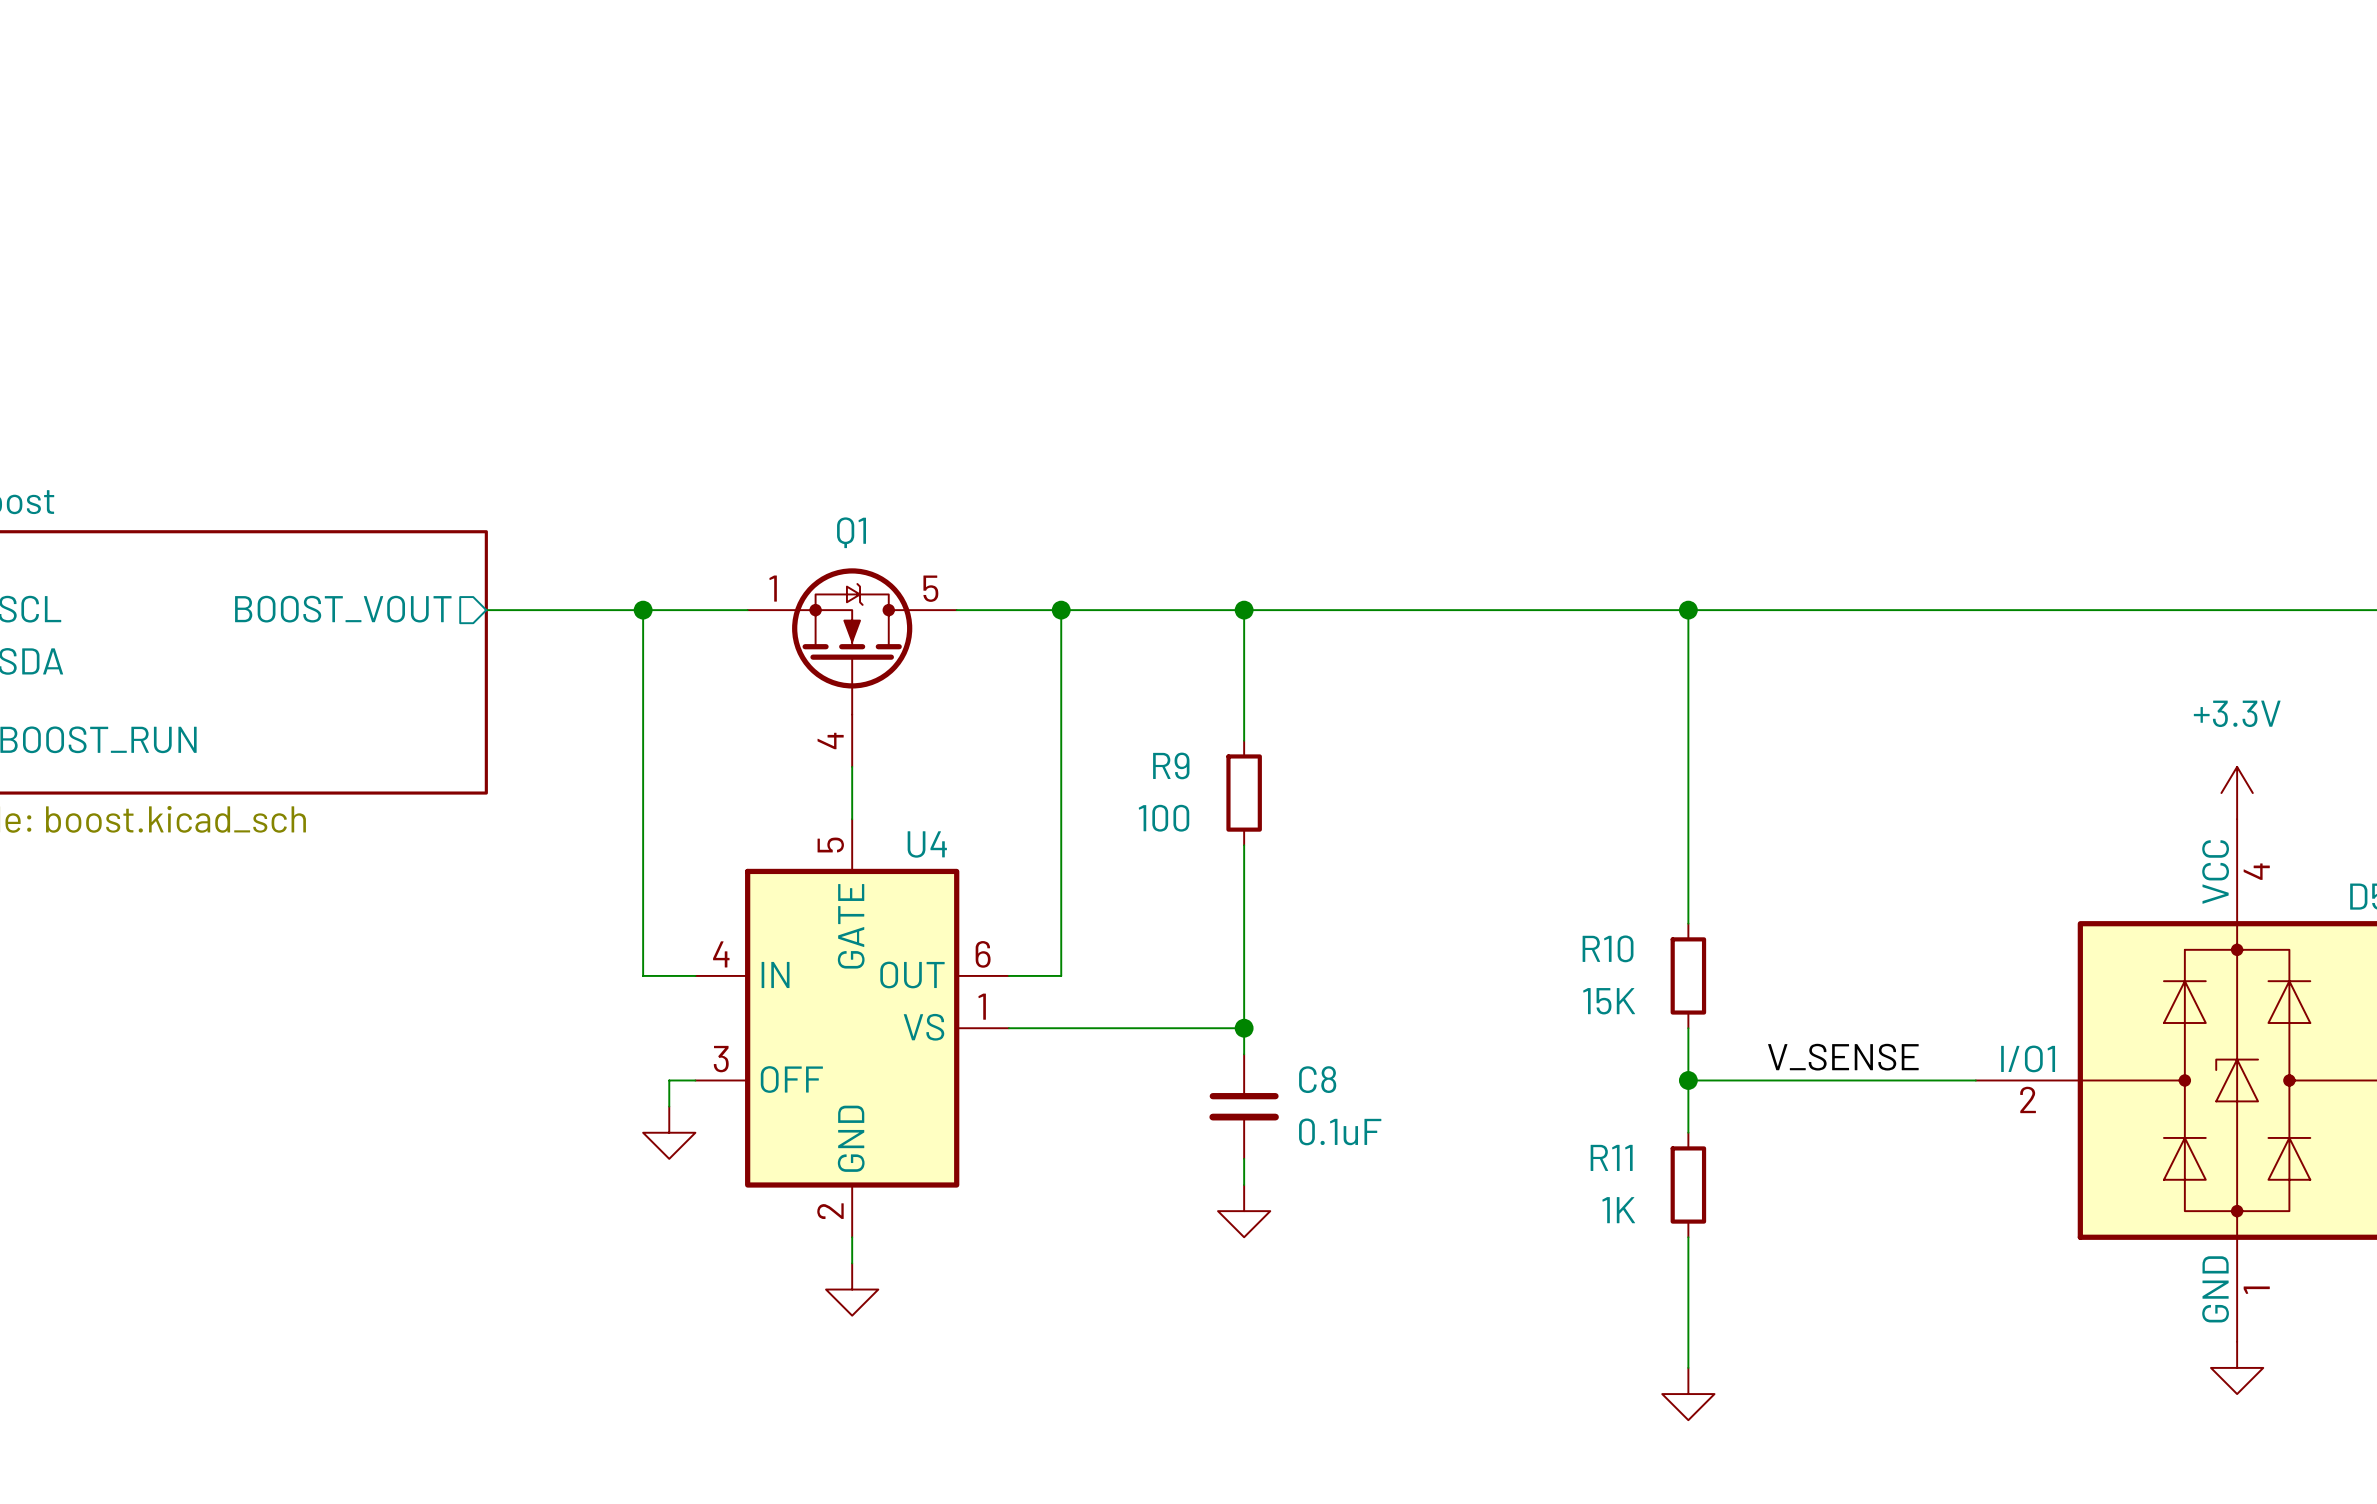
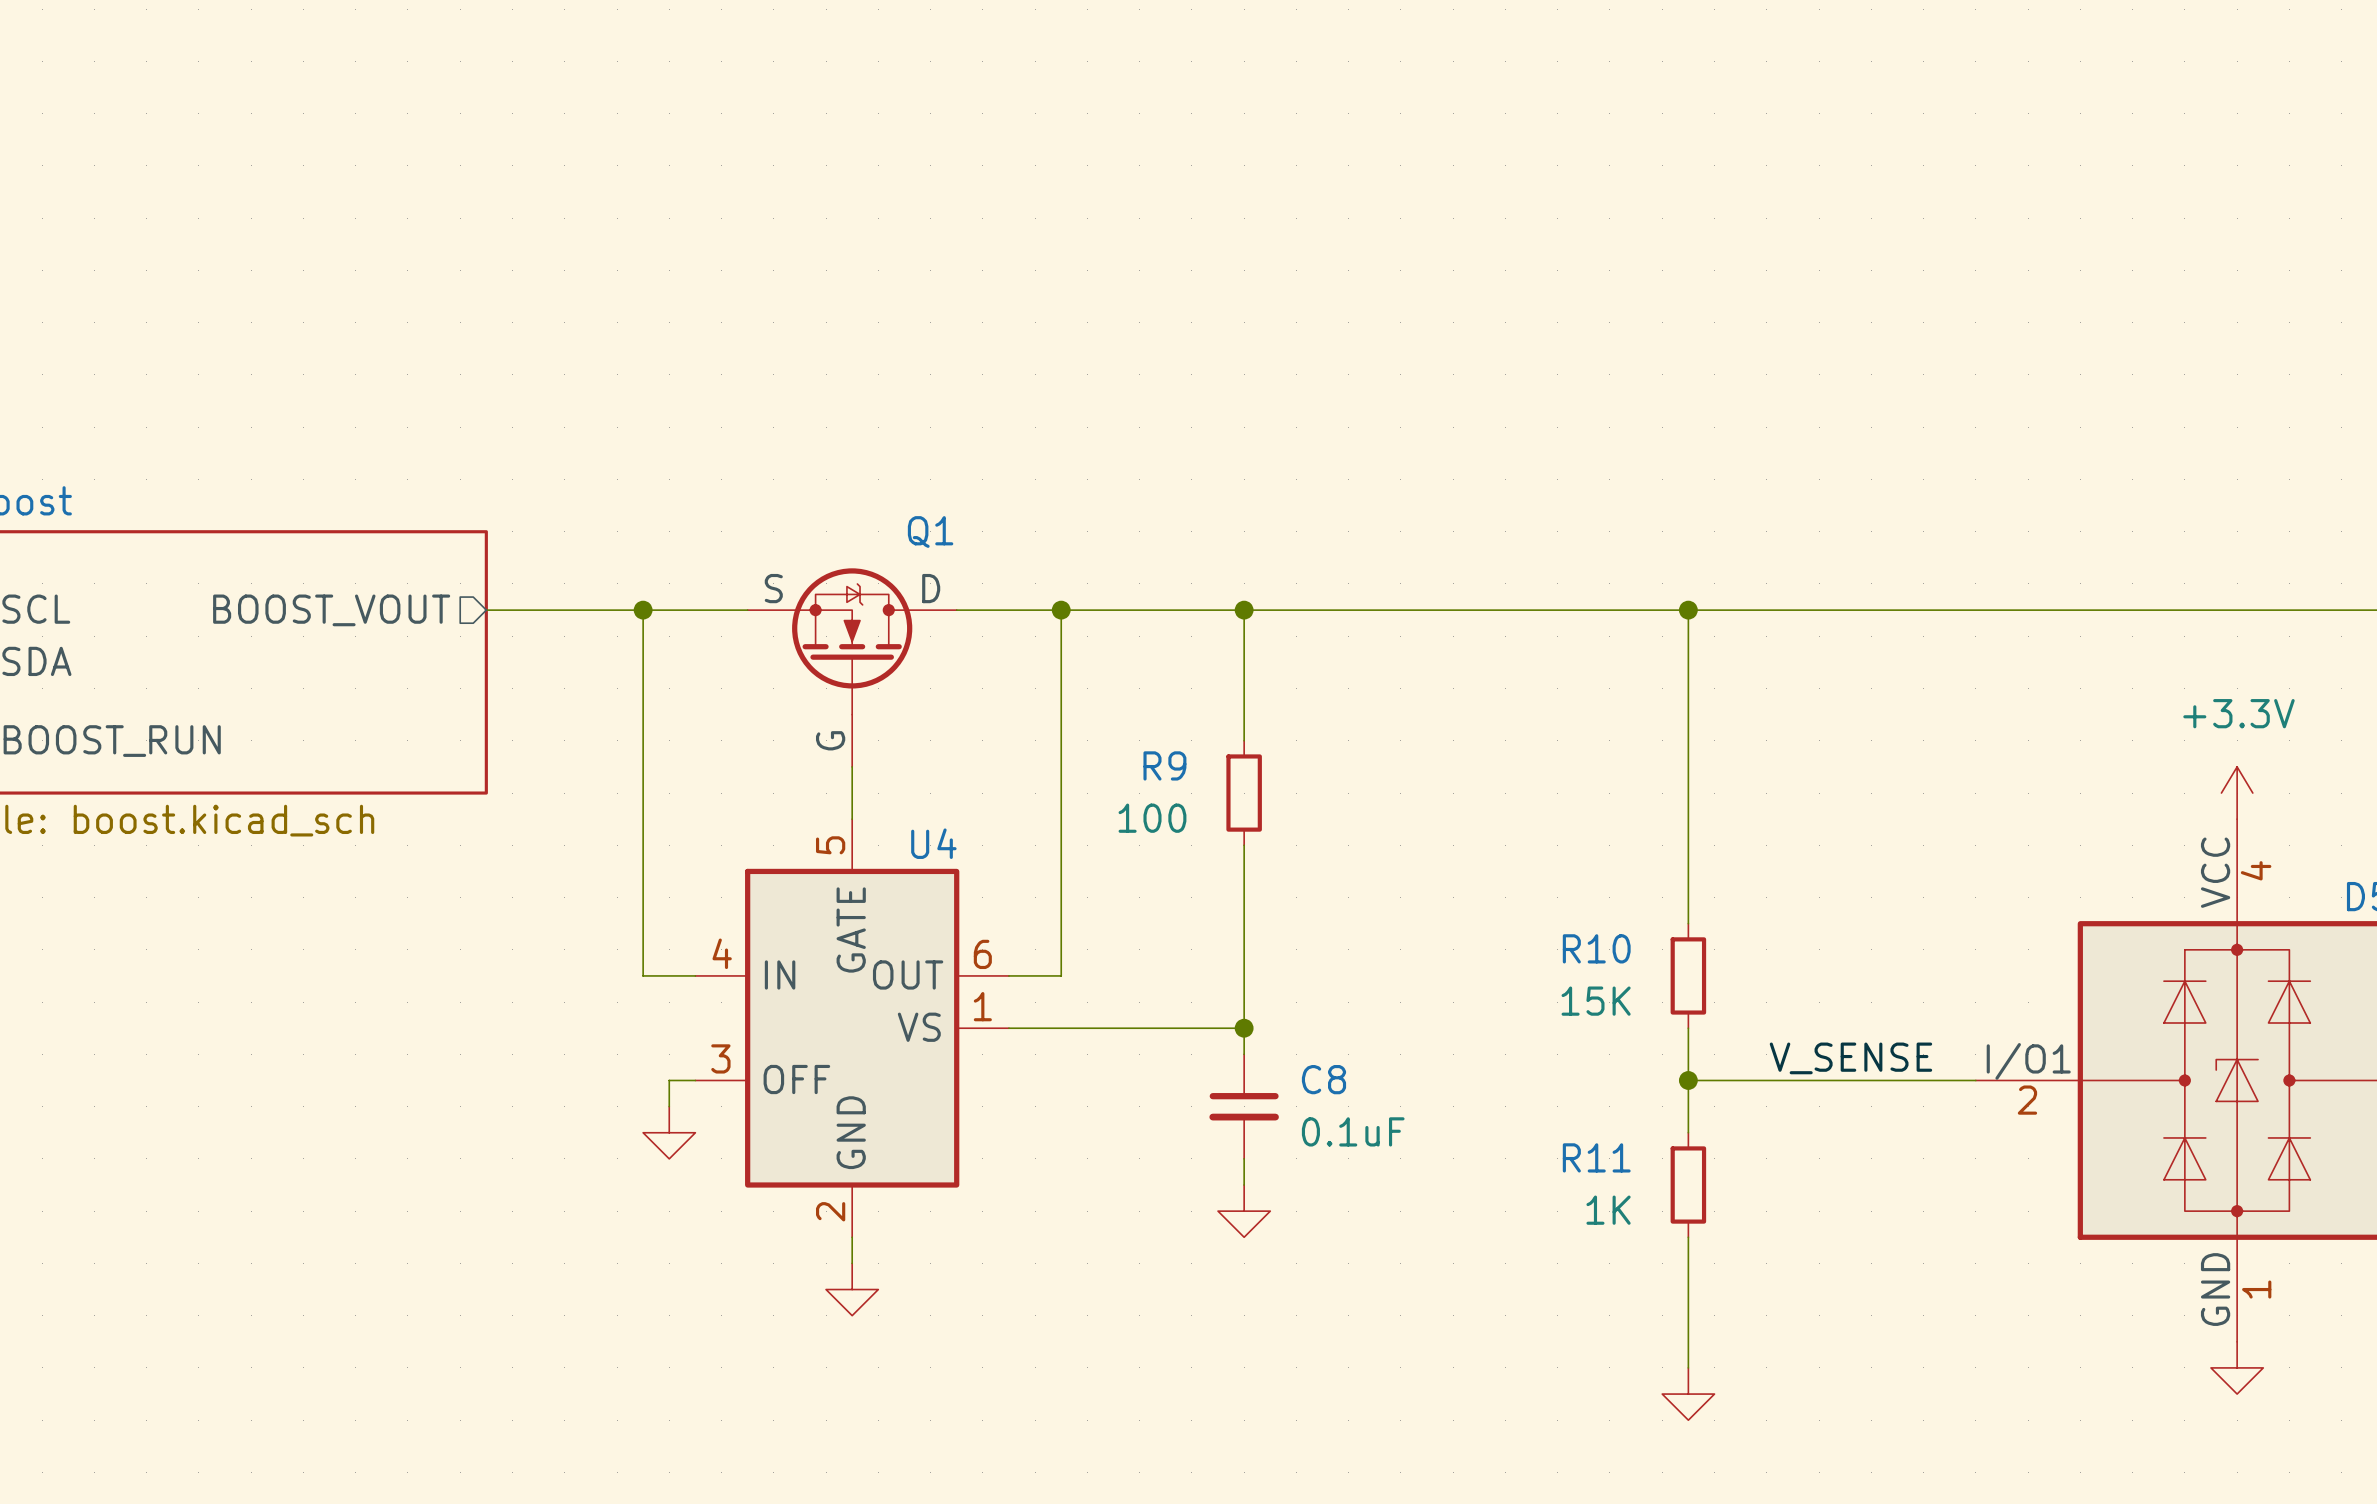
Q1 name position: Q1 (851, 532) -> Q1 (930, 532)
Q1 pin name: none -> S (773, 588)
Q1 pin number: 1 (773, 588) -> none
Q1 pin number: 5 (930, 588) -> none
Q1 pin name: none -> D (931, 588)
Q1 pin name: none -> G (830, 740)
Q1 pin number: 4 (830, 741) -> none

